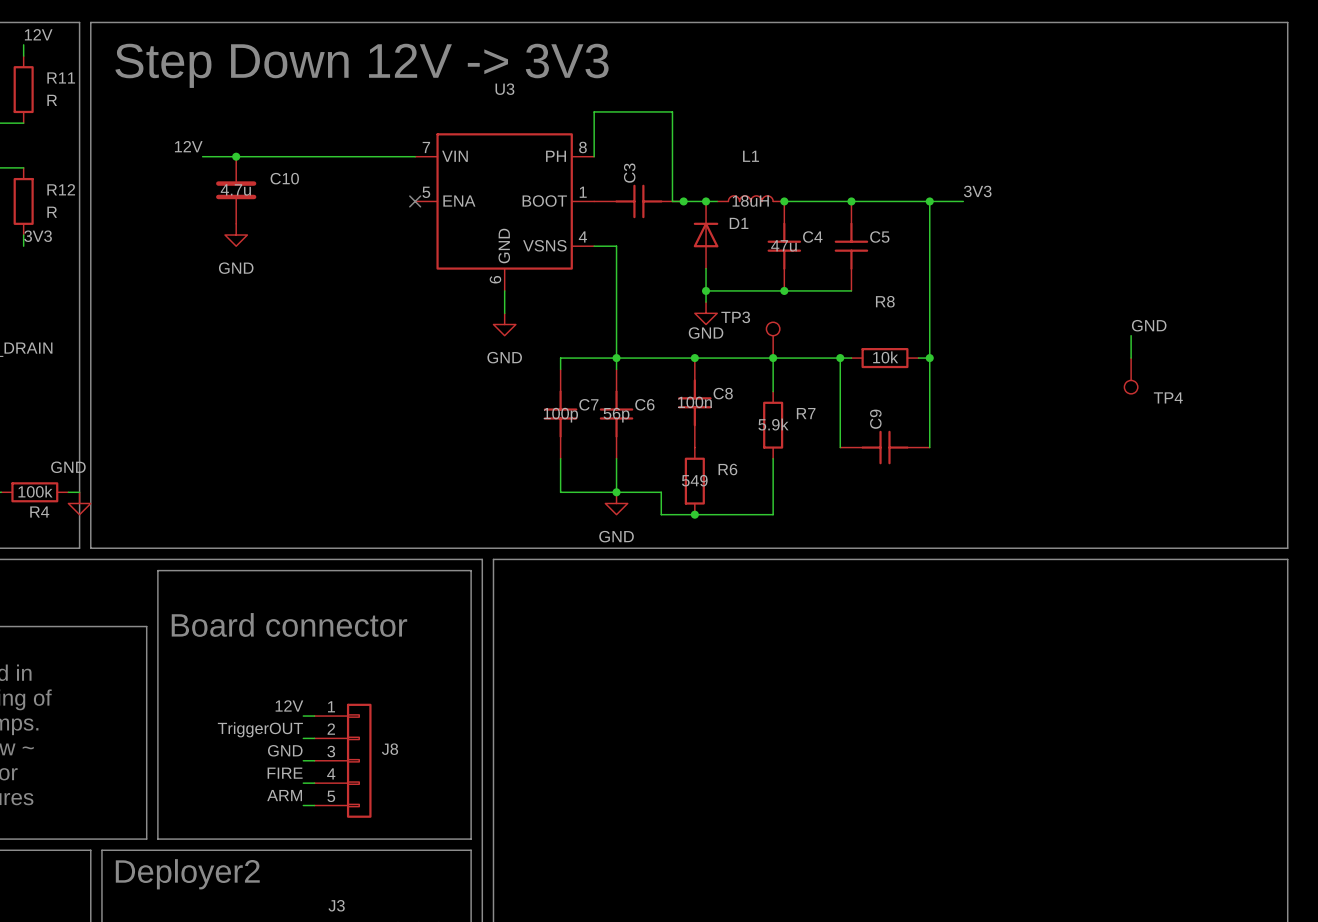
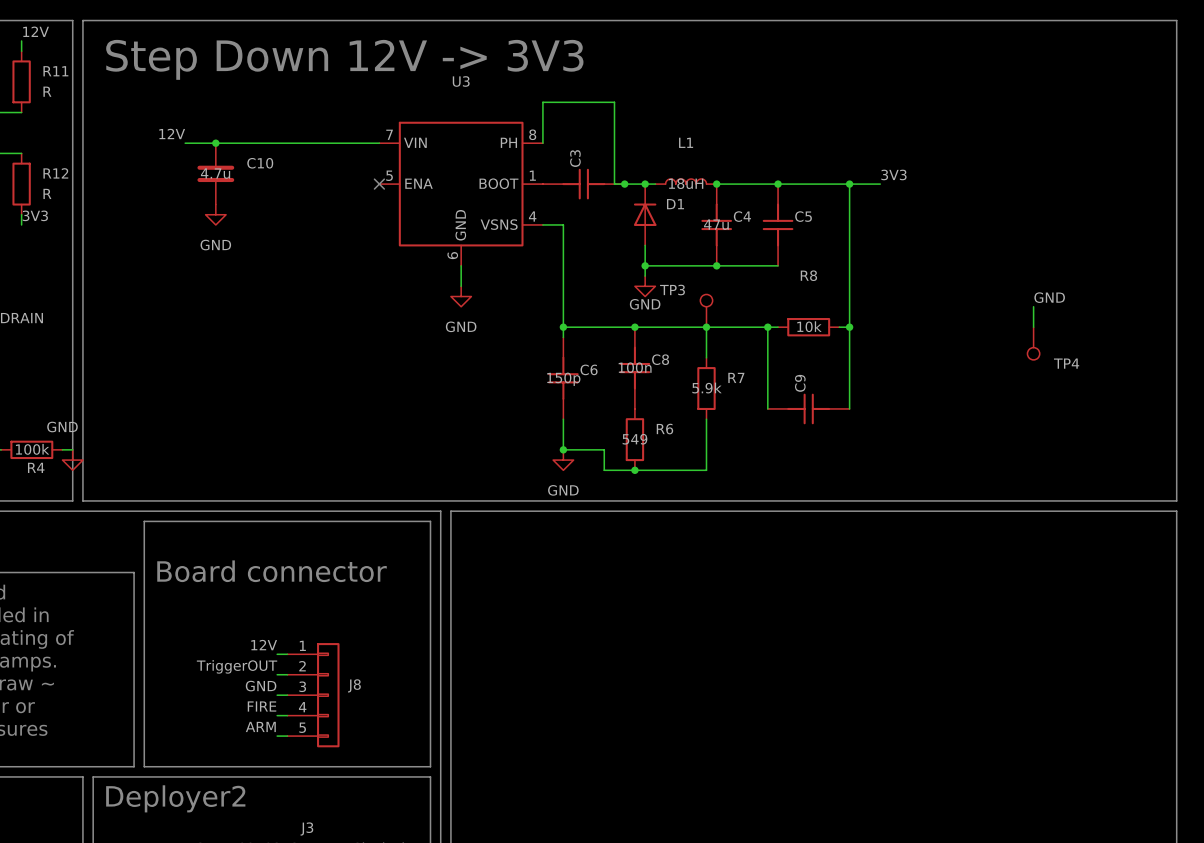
wire: (616, 358) (560, 358) (560, 369) -> none
C7: 100p (560, 413) -> none
C6 value: 56p (616, 415) -> 150p (563, 379)
wire: (560, 458) (560, 492) (616, 492) -> none

